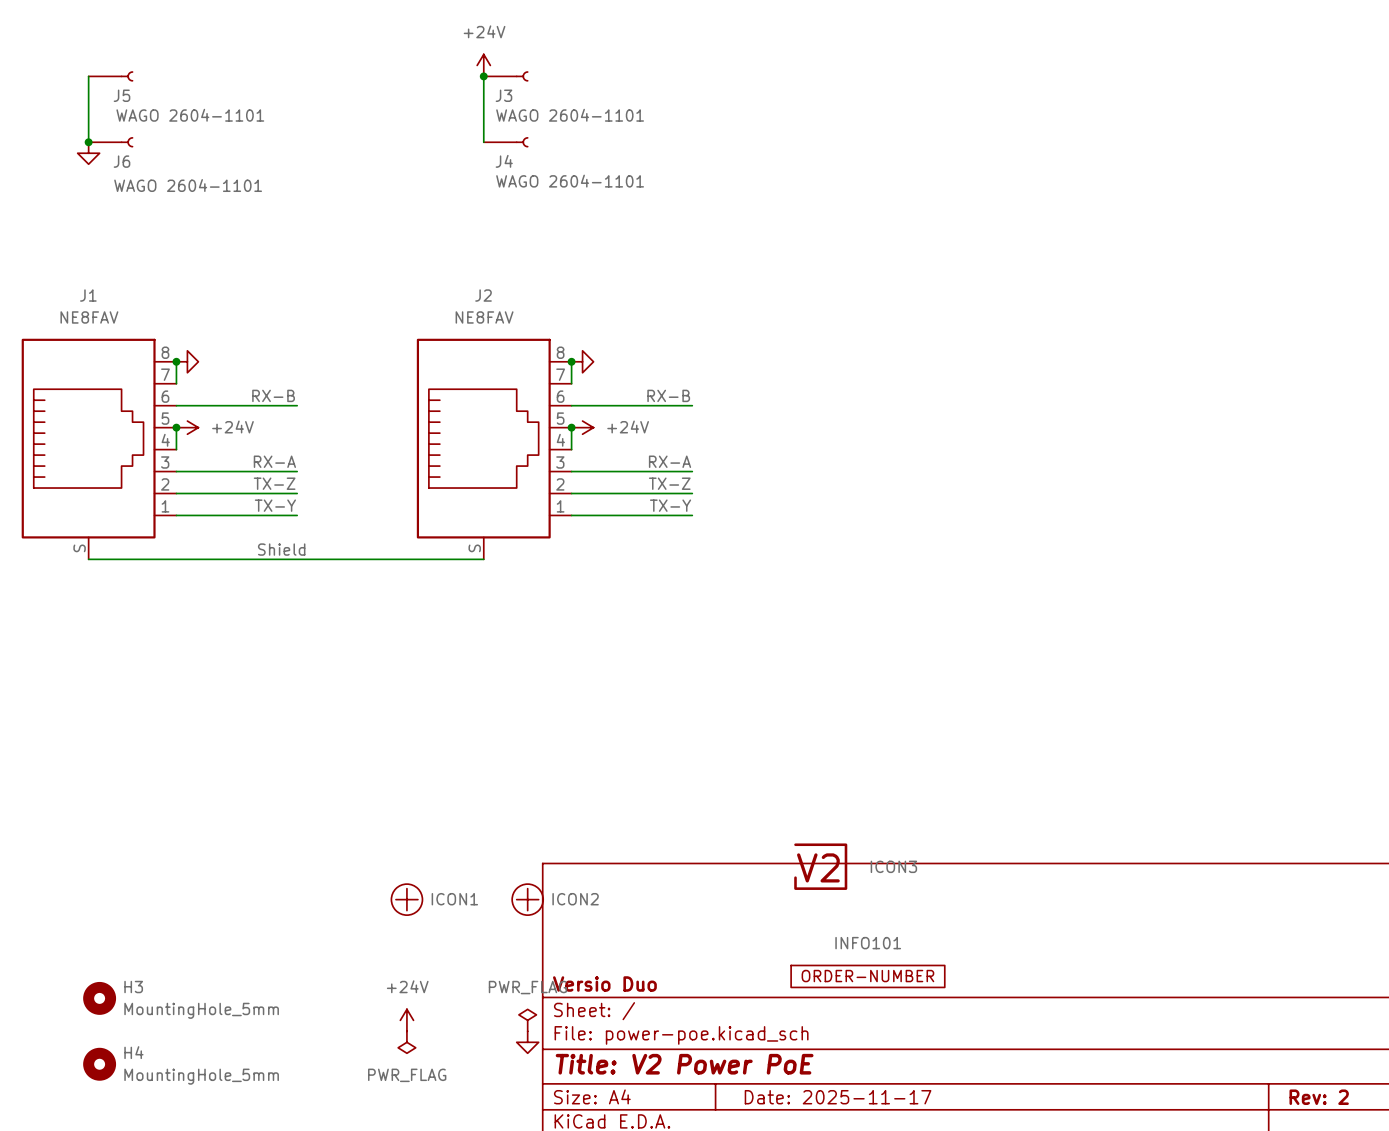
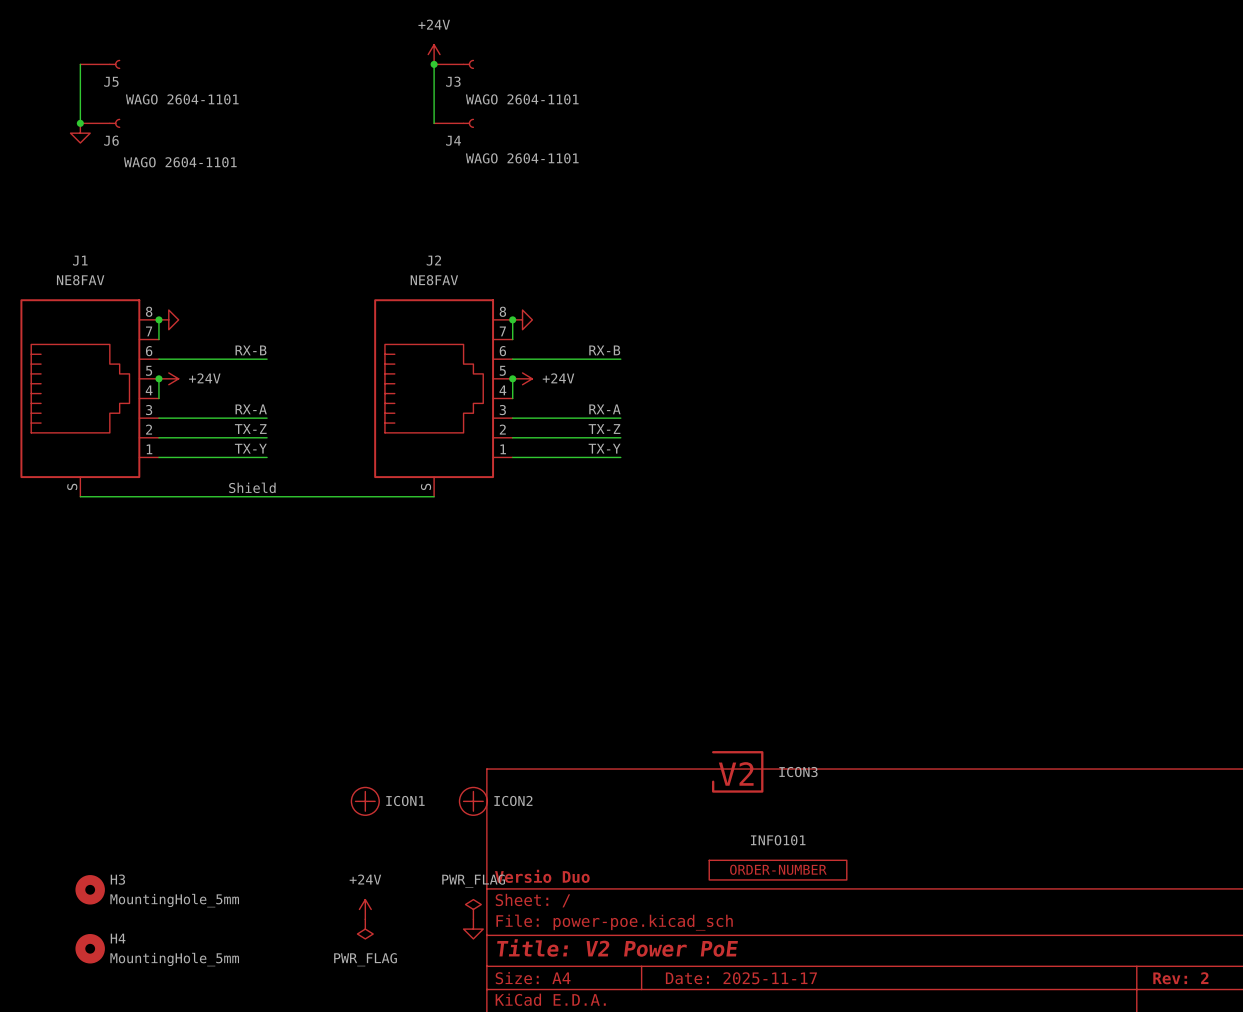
ICON3 symbol: [794, 843, 848, 890] -> [712, 751, 764, 793]

